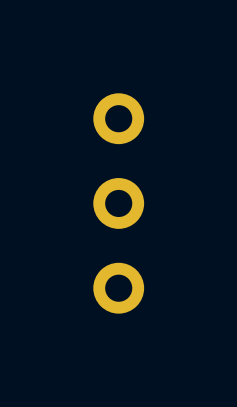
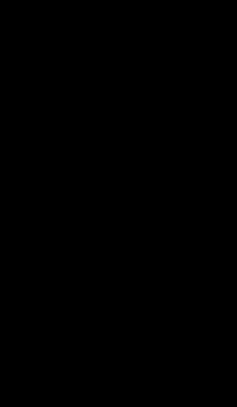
part: (118, 203) -> none

